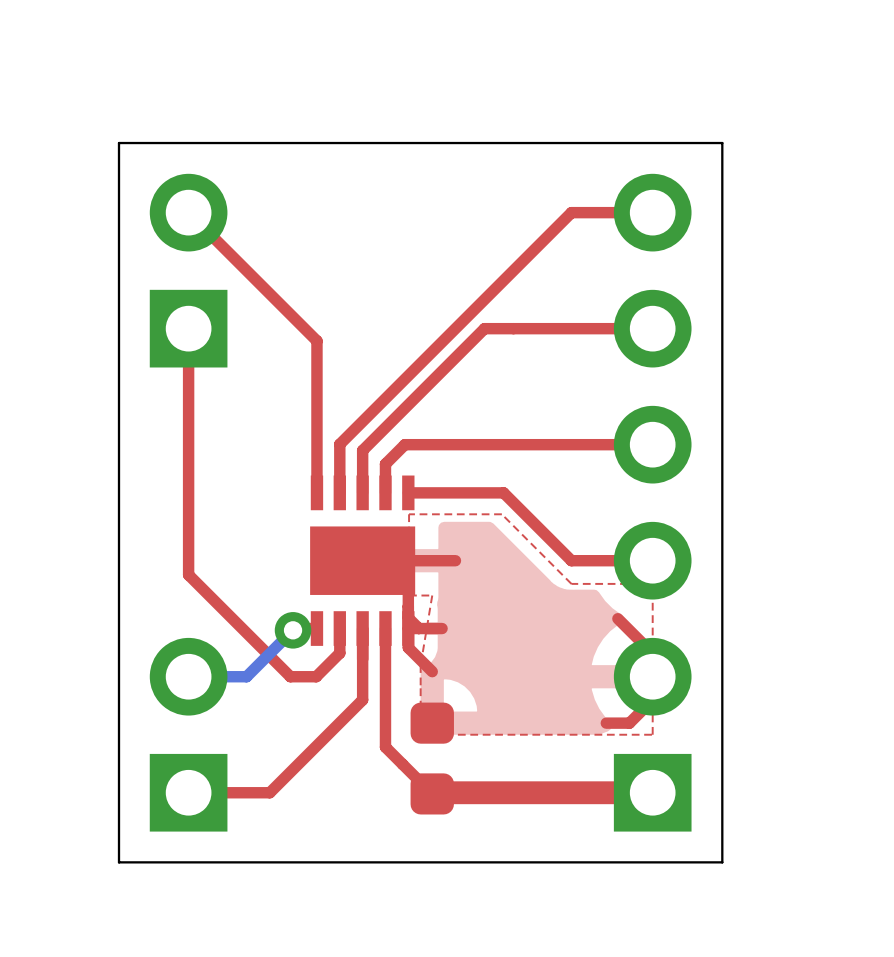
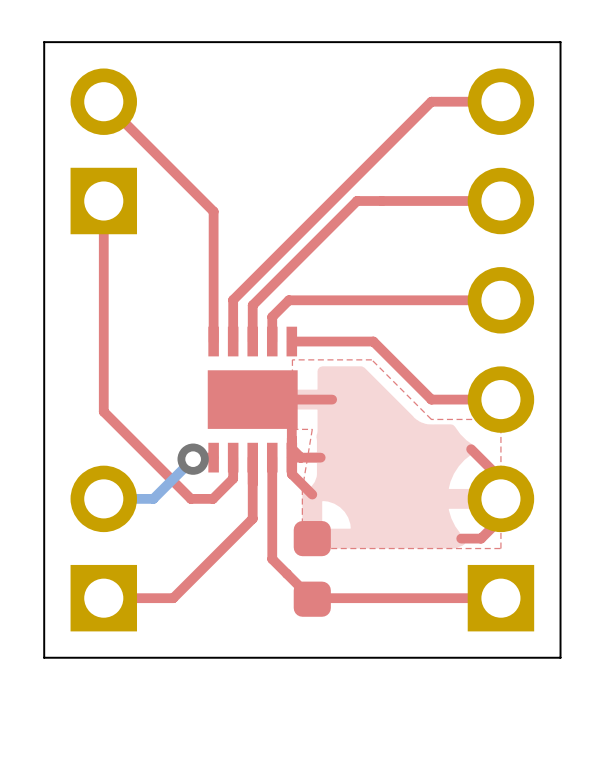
top track width: thick (652, 792) (433, 792) -> thin (500, 598) (313, 598)

